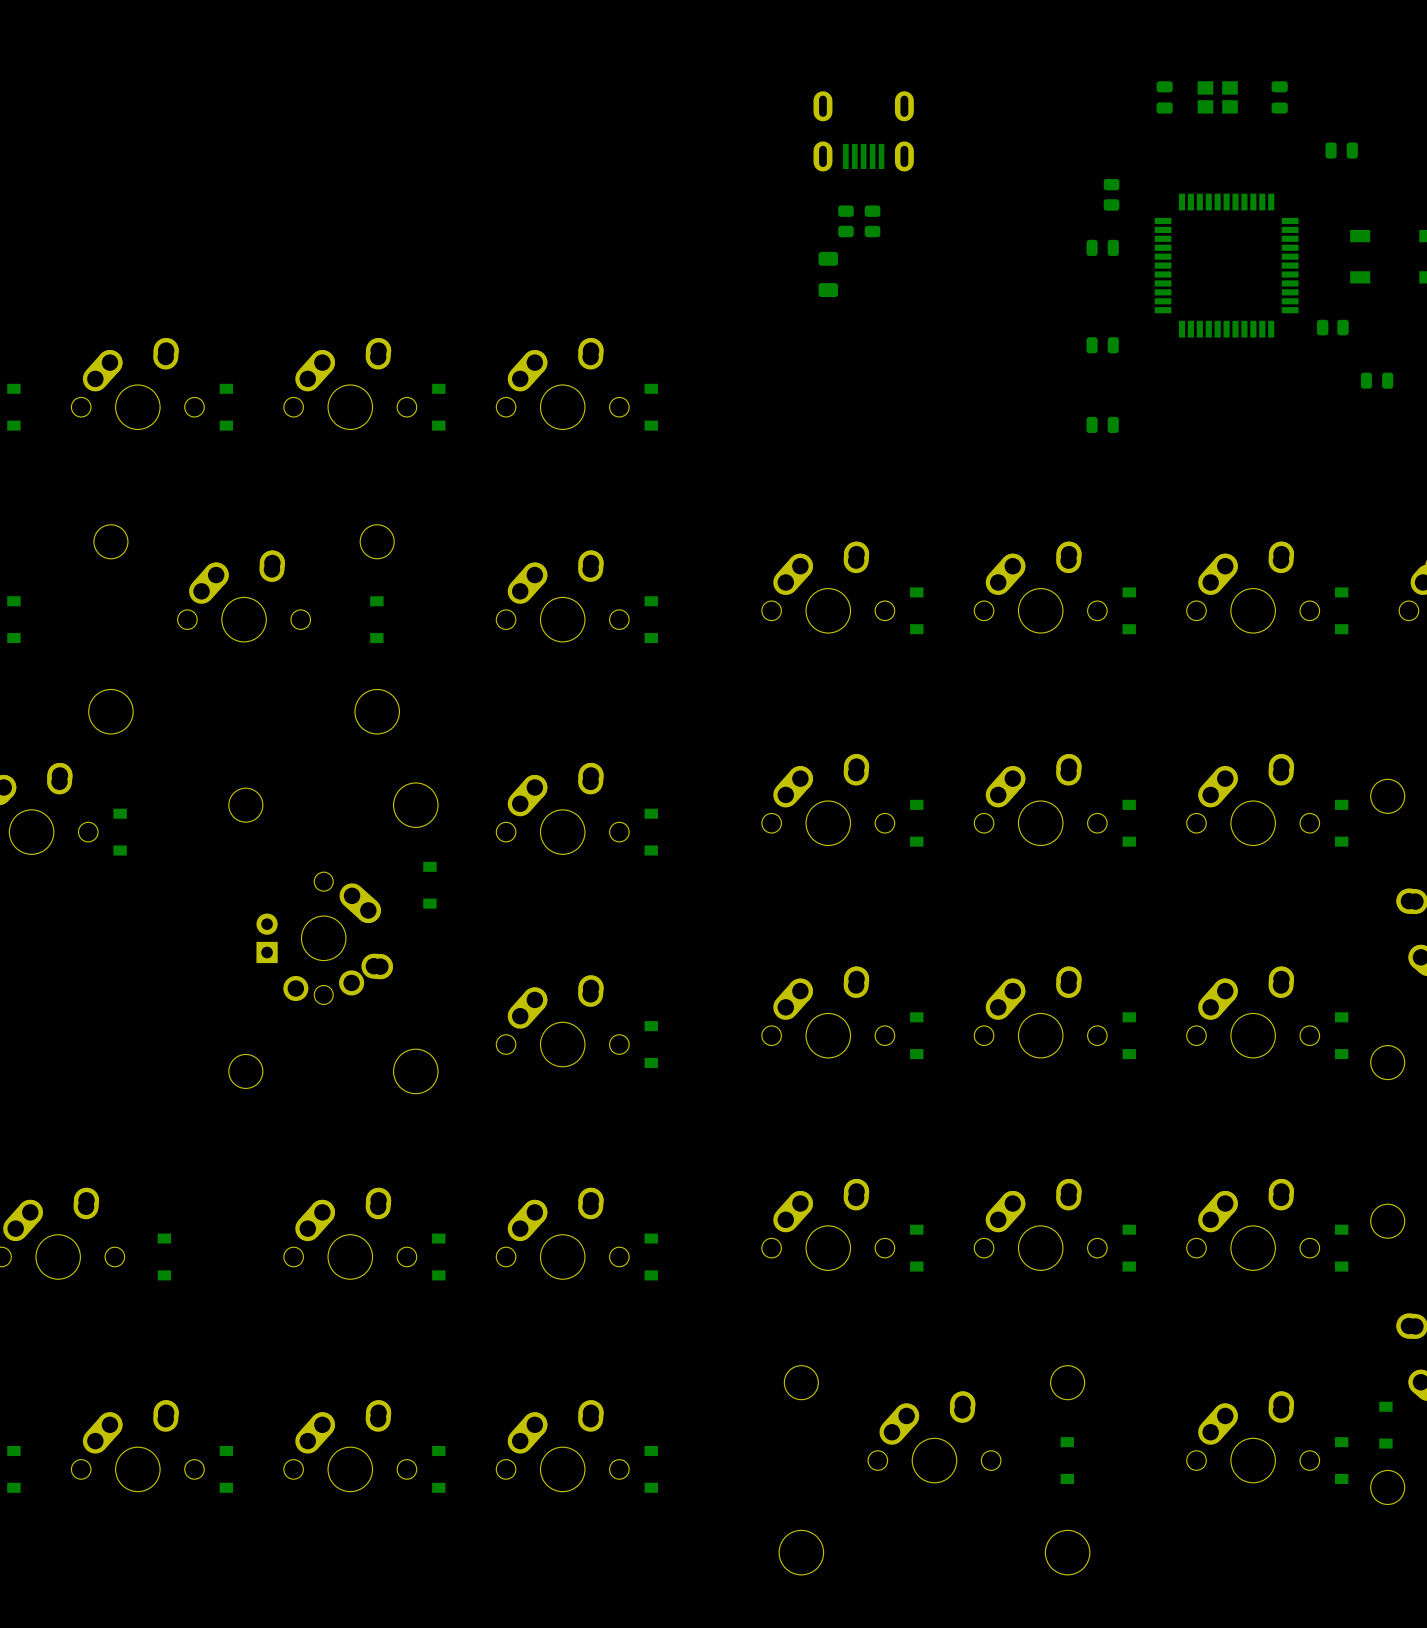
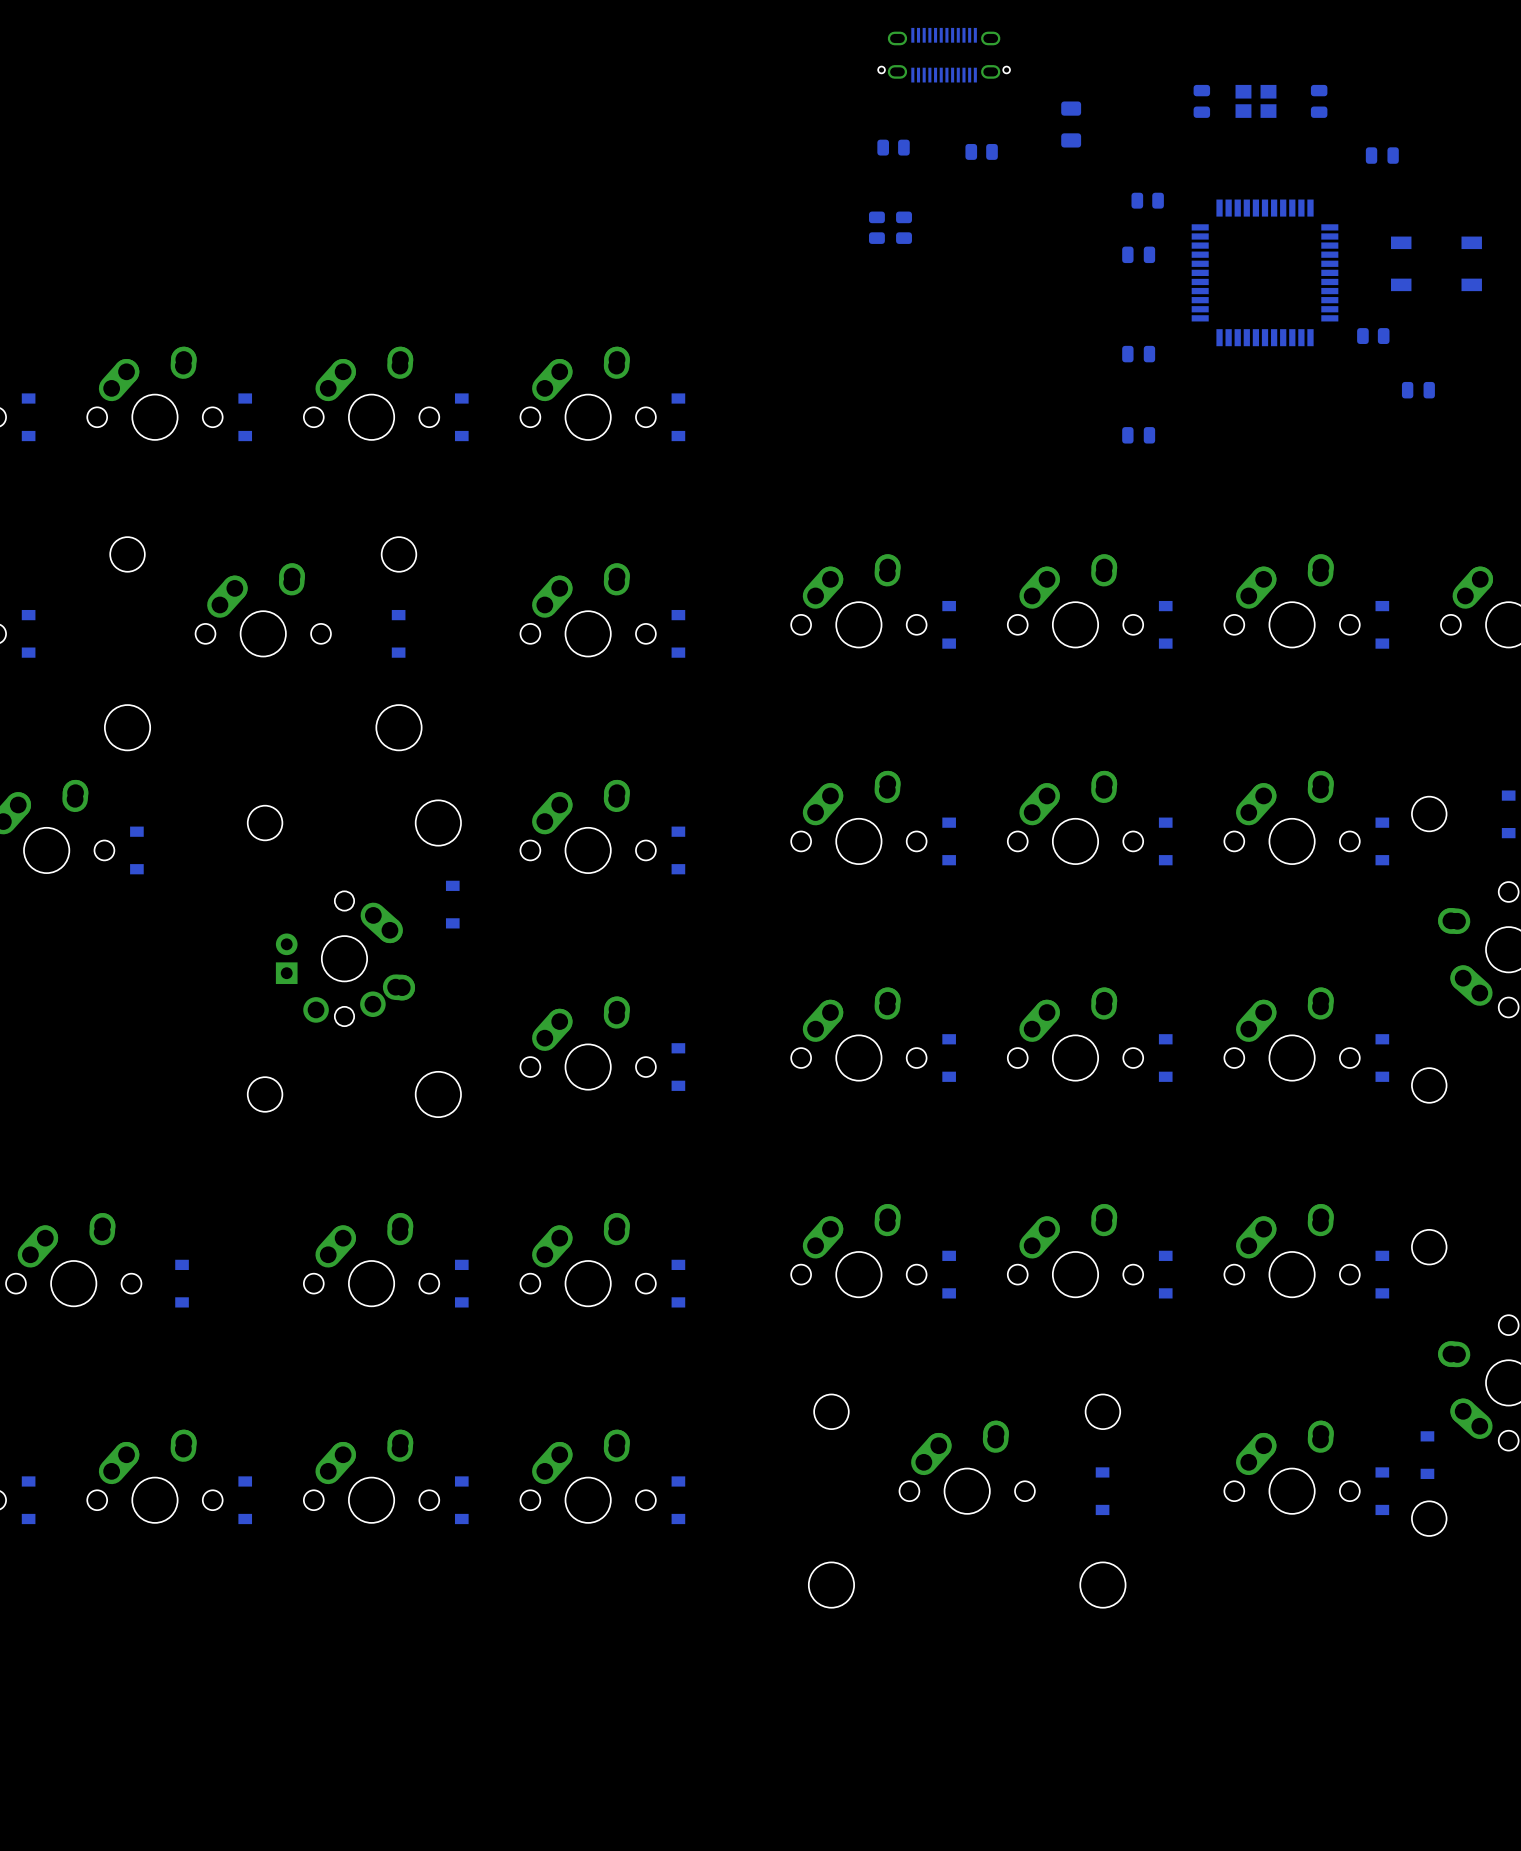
part: none -> (944, 55)
part: (863, 131) -> none
part: none -> (893, 147)
part: none -> (981, 151)
part rotation: 0° (1111, 194) -> 90° clockwise (1147, 200)
part position: (828, 274) -> (1071, 124)

